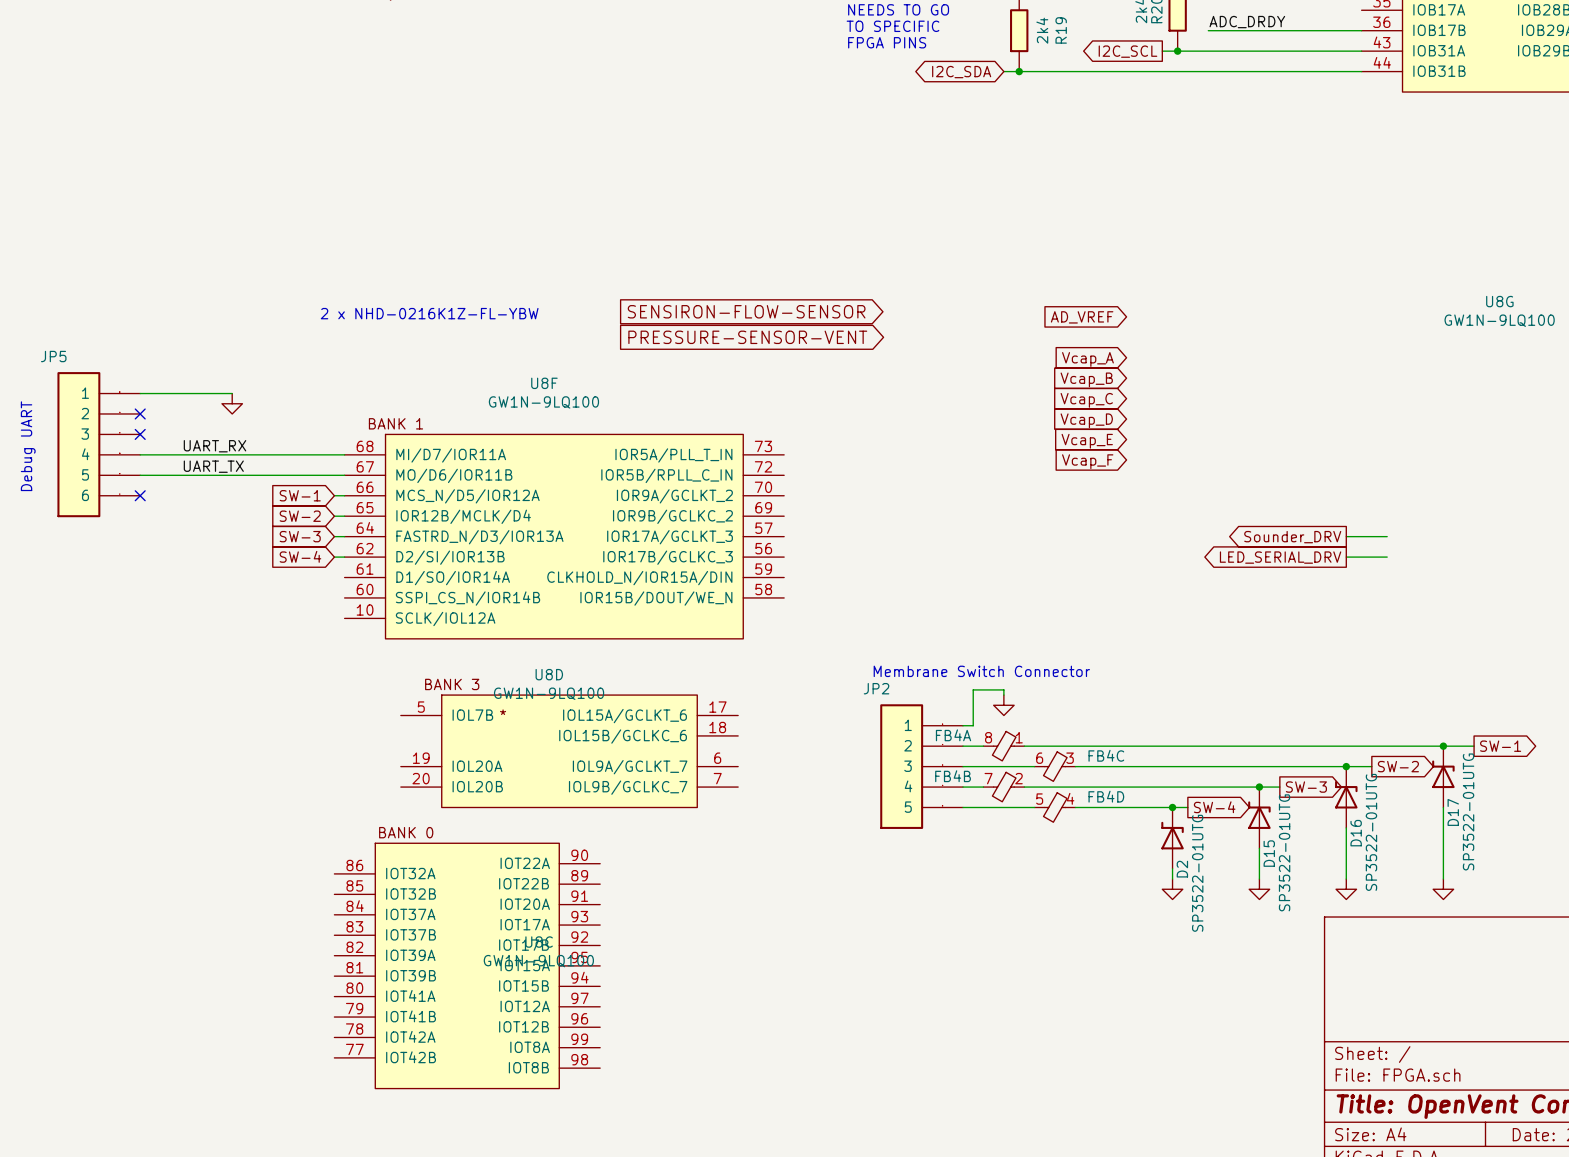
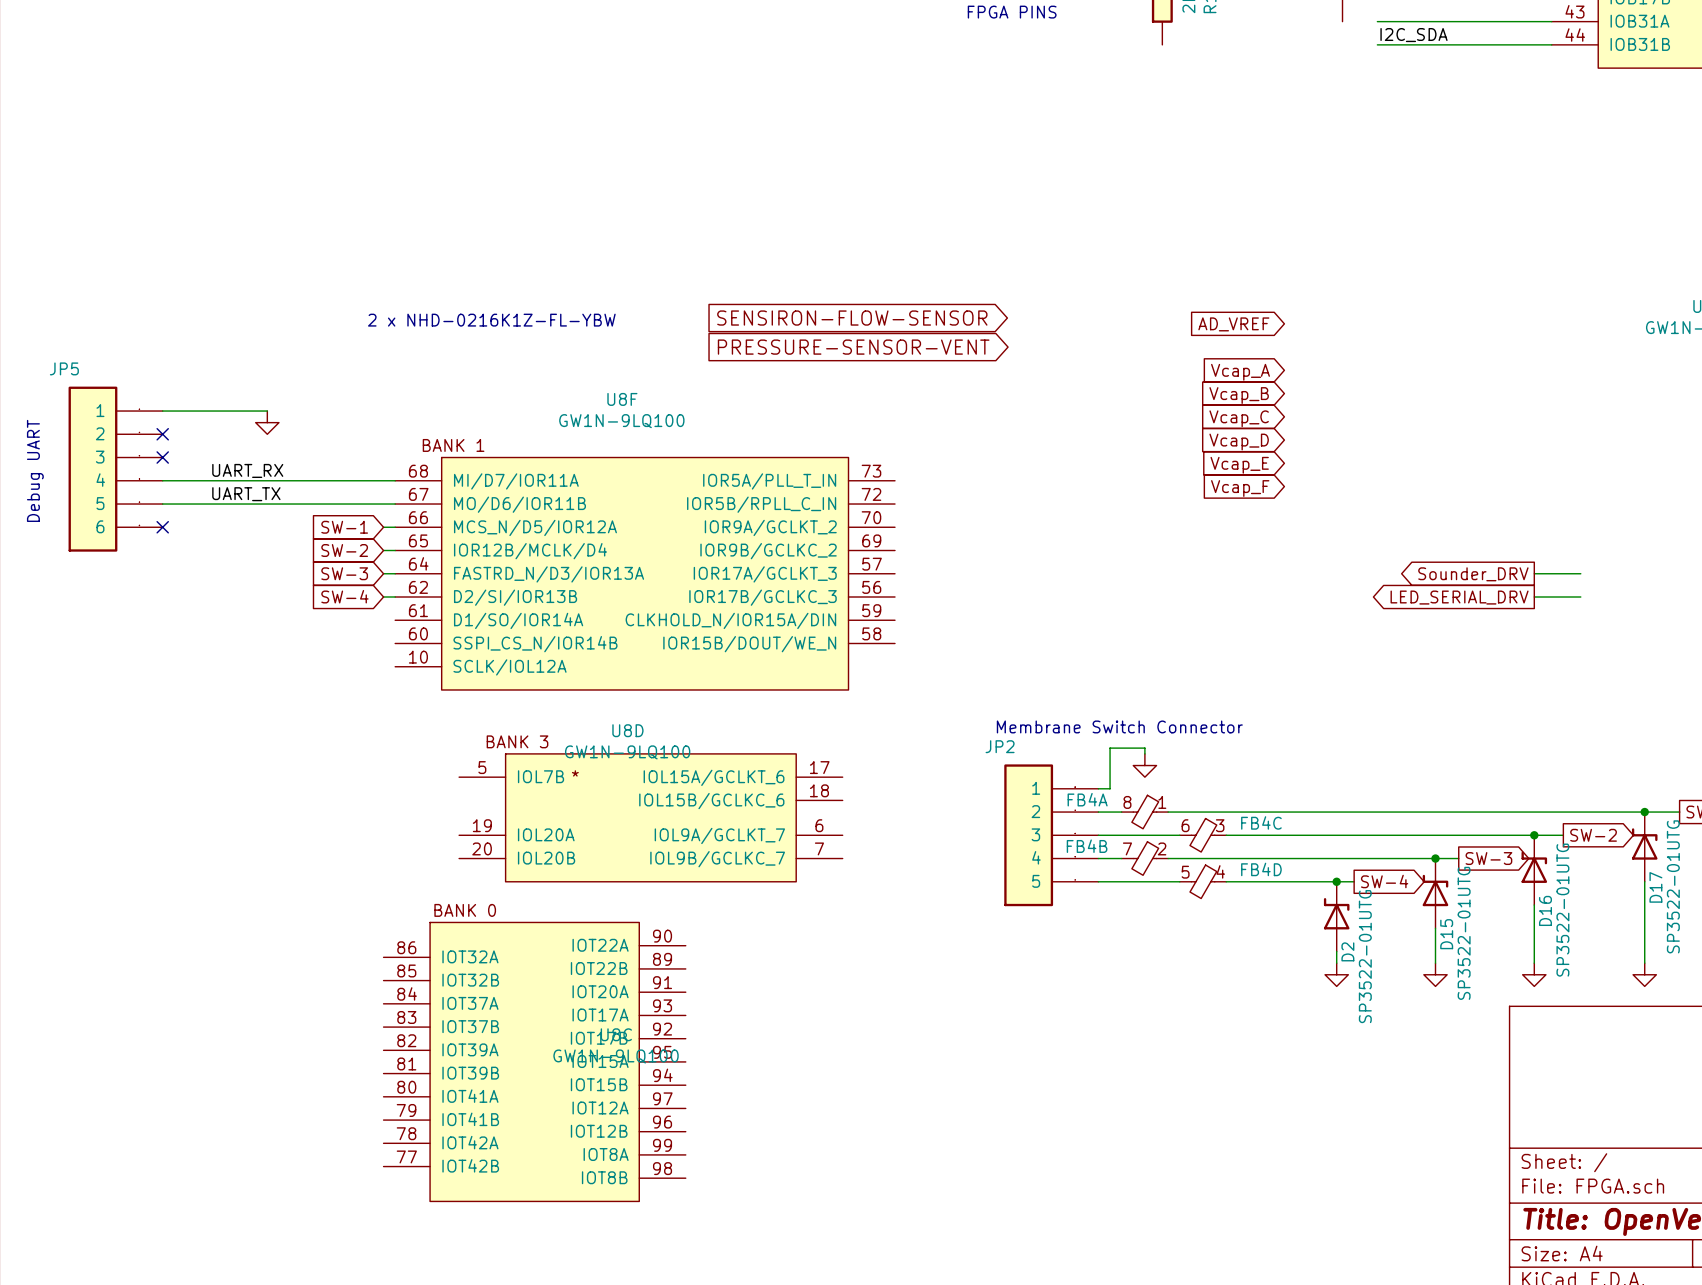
global label: I2C_SCL (1127, 51) -> none
wire: (1162, 51) (1208, 51) -> none
junction: (1177, 51) -> none
label: none -> I2C_SDA (1414, 35)
wire: (1003, 71) (1208, 71) -> none
junction: (1019, 71) -> none
global label: I2C_SDA (961, 72) -> none

